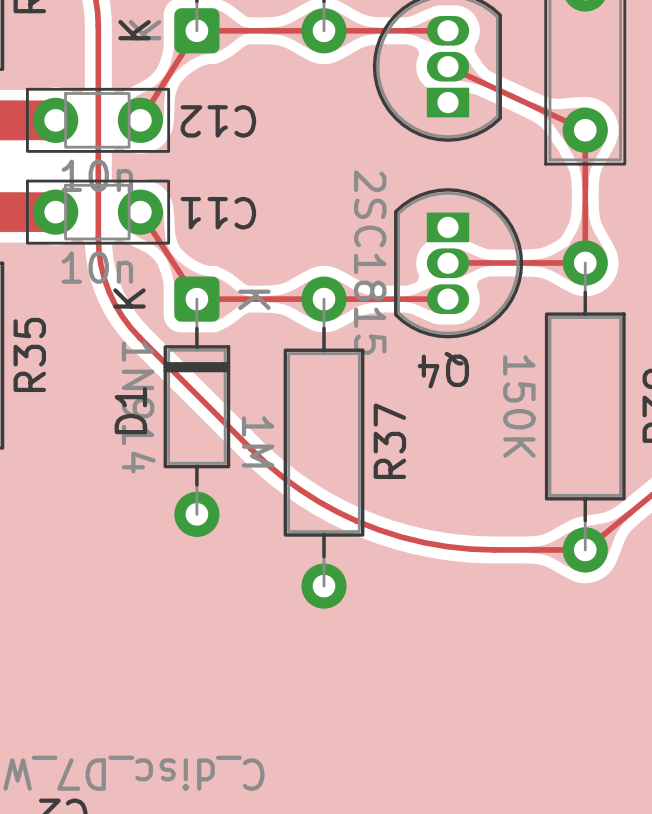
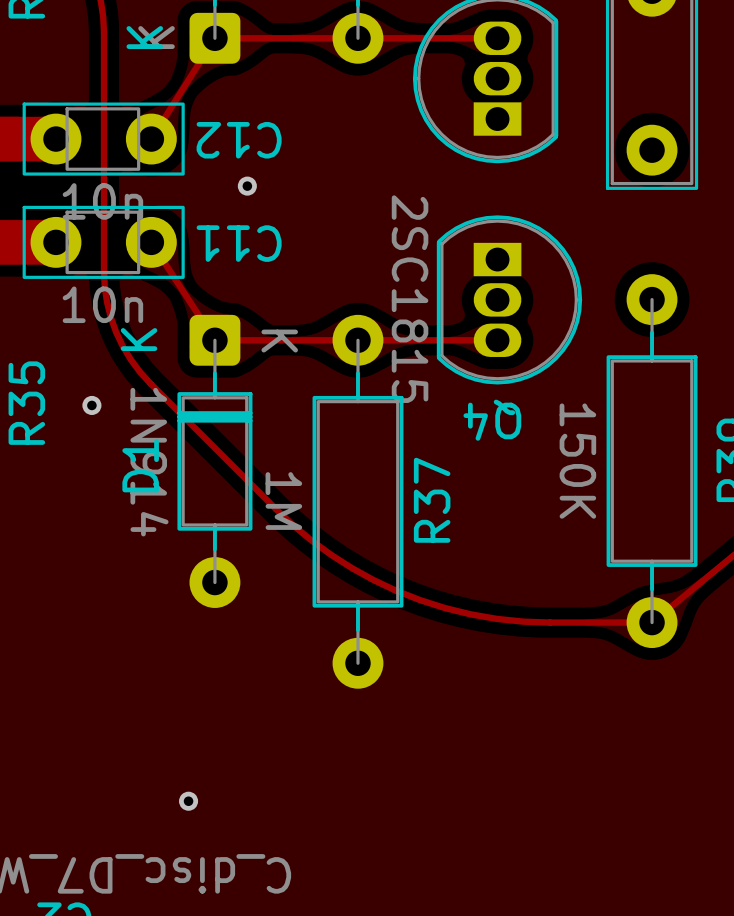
track: (447, 66) (585, 130) (585, 262) (448, 262) -> none
via: none -> (247, 186)
via: none -> (91, 405)
via: none -> (188, 801)

